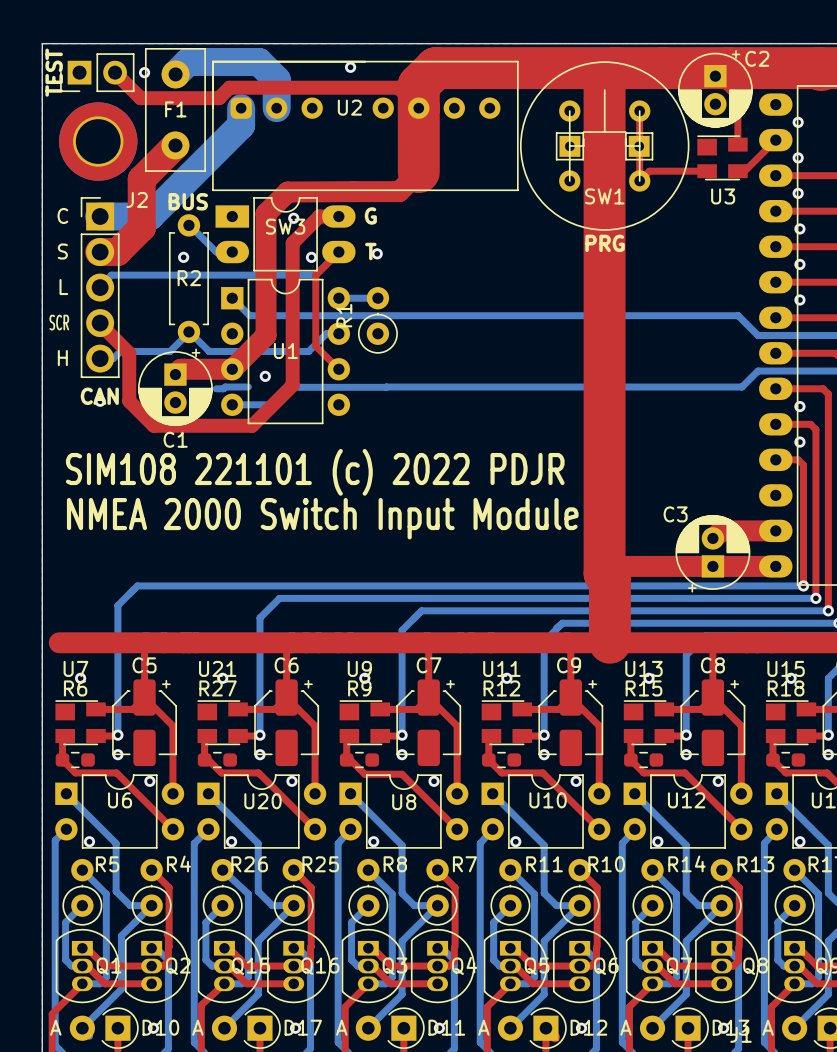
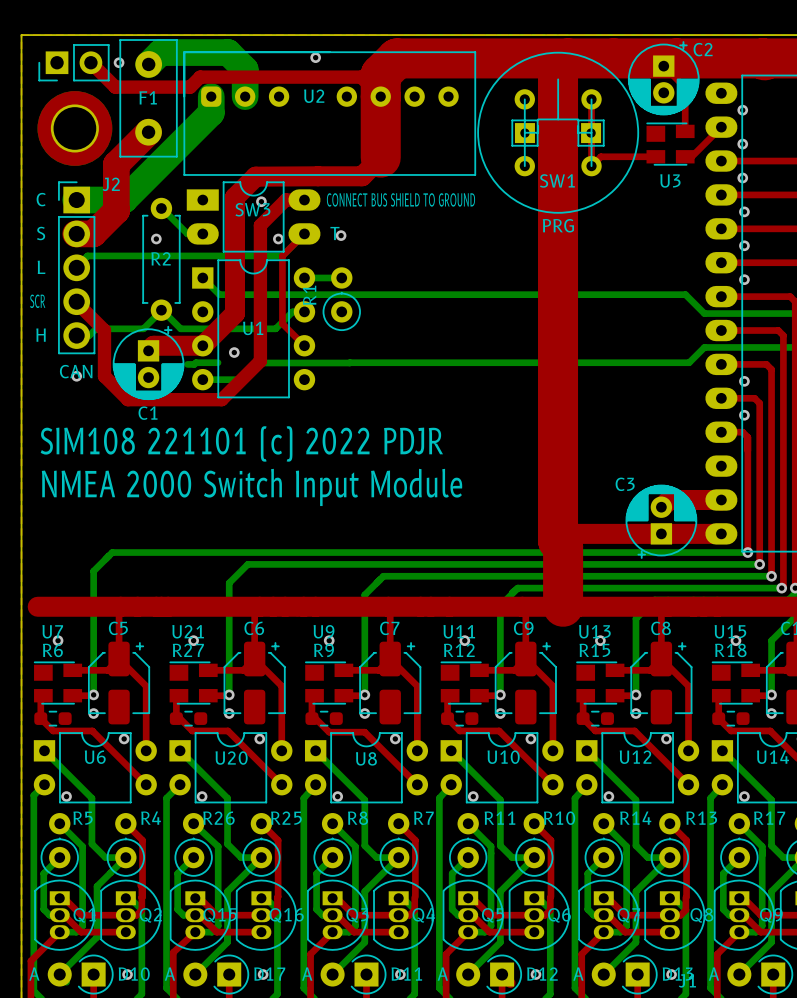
TEST name: TEST (54, 72) -> none
SW3 value: BUS (188, 201) -> none
text: G (370, 215) -> CONNECT BUS SHIELD TO GROUND (400, 199)

